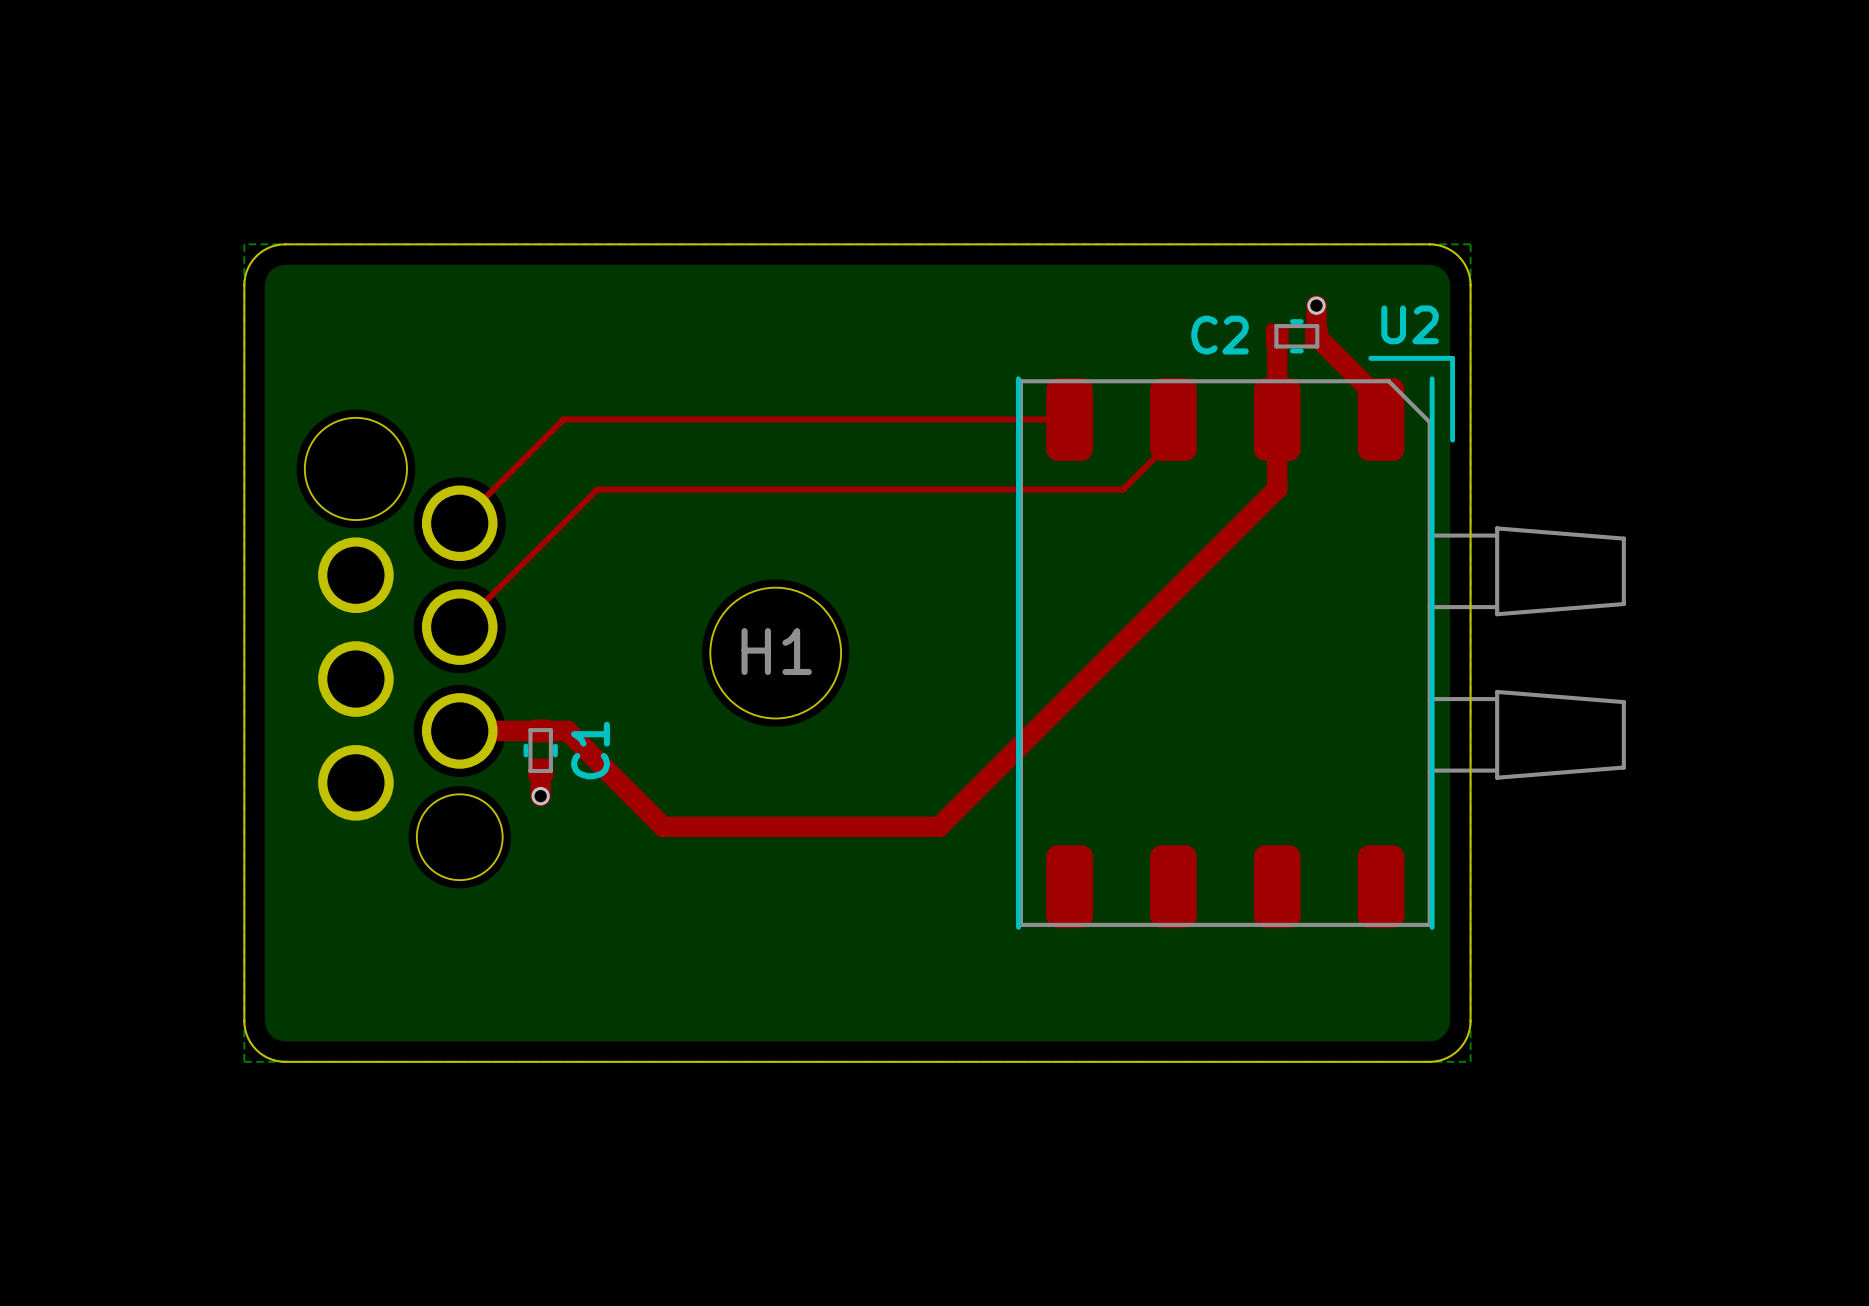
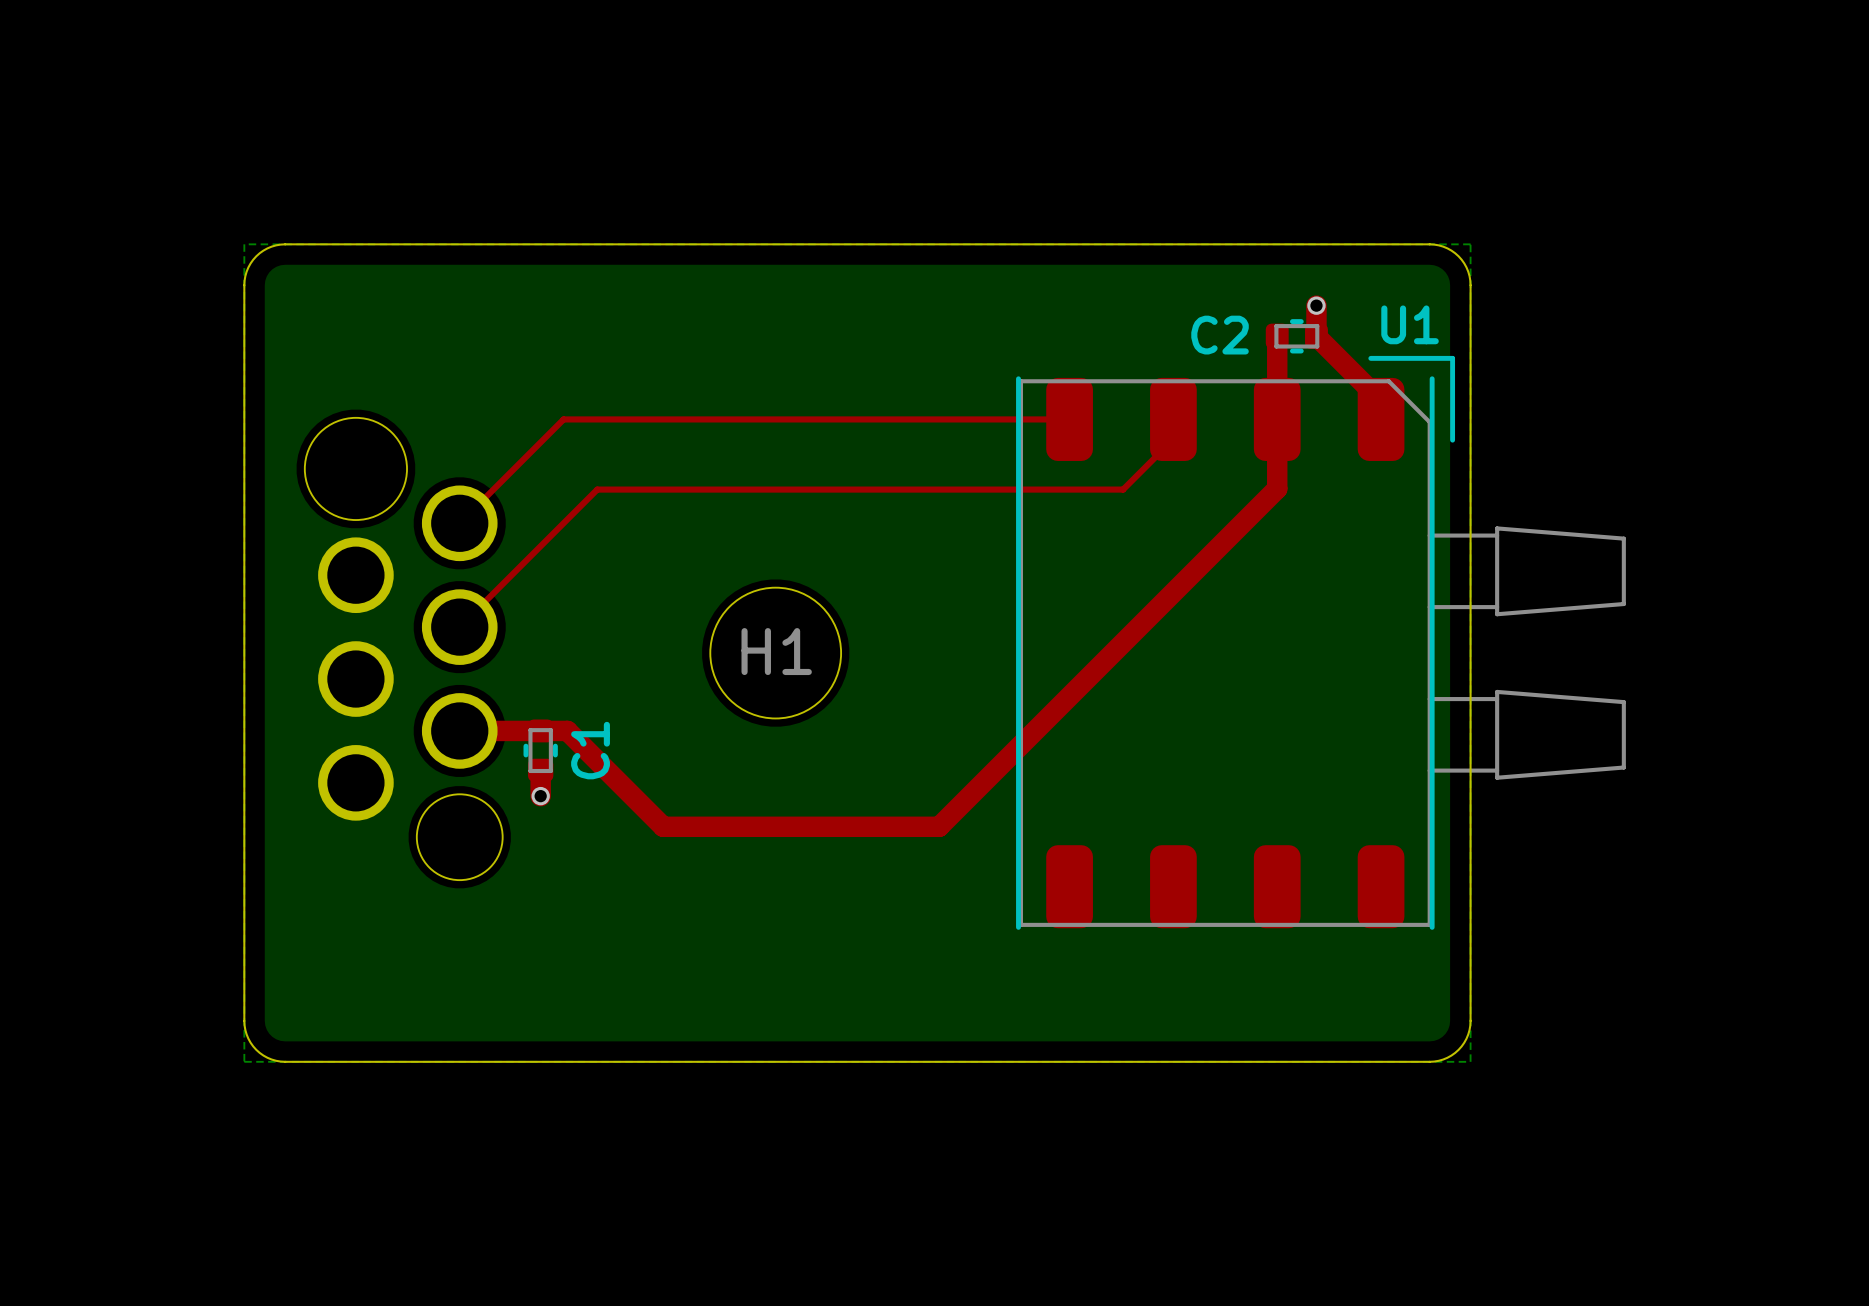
U2 name: U2 (1410, 324) -> U1 (1410, 324)

